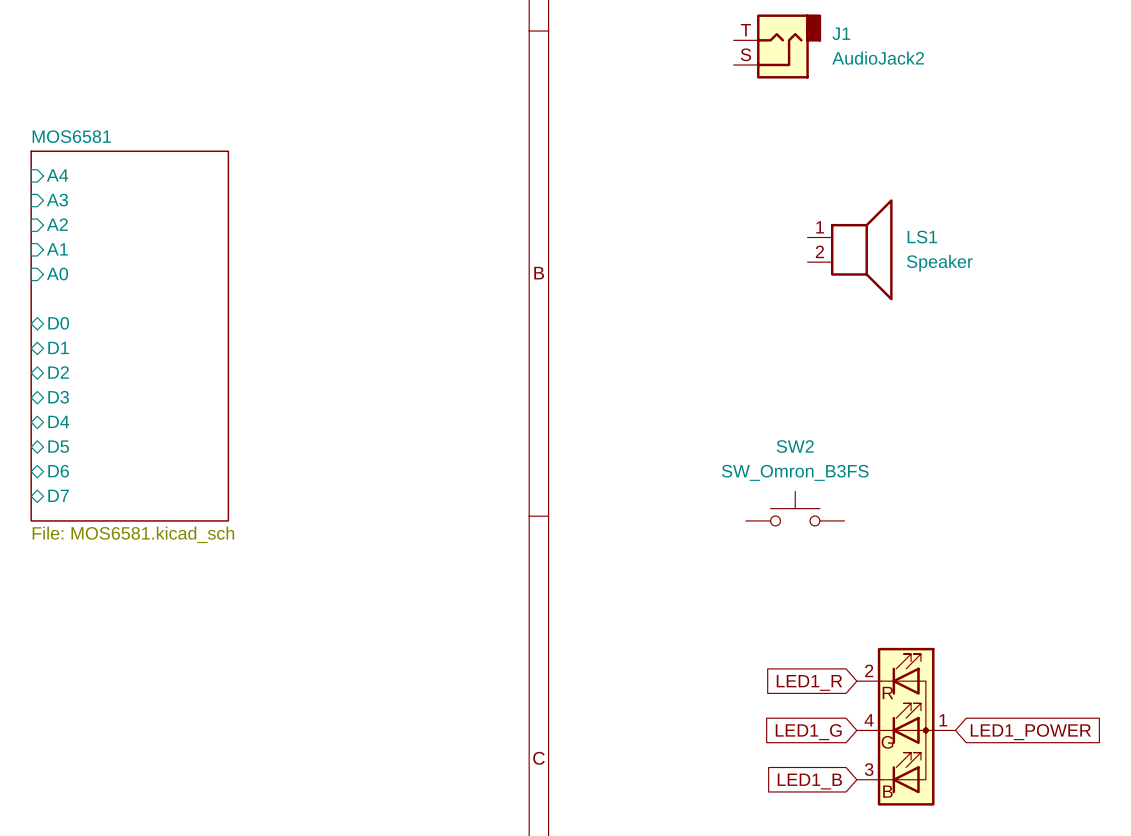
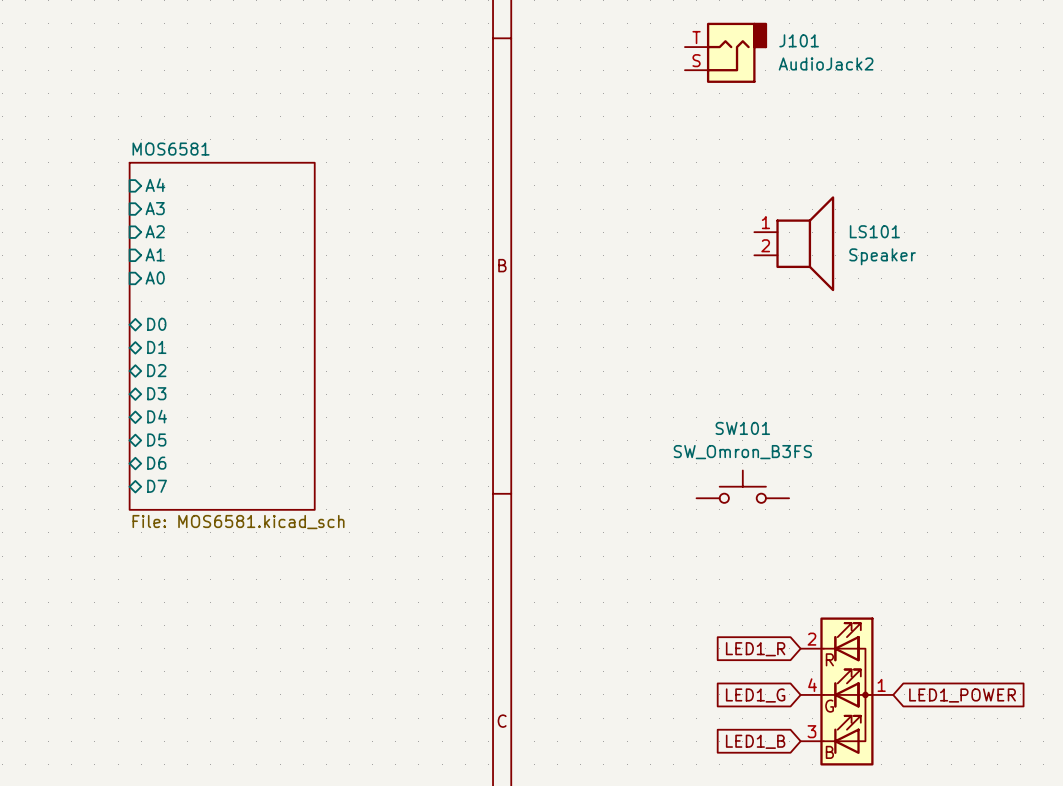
J1 name: J1 (841, 33) -> J101 (799, 40)
sheet pin position: A4 (57, 175) -> A4 (155, 185)
sheet pin position: A3 (57, 200) -> A3 (155, 208)
sheet pin position: A2 (57, 224) -> A2 (155, 231)
LS1 name: LS1 (922, 237) -> LS101 (874, 231)
sheet pin position: A1 (57, 249) -> A1 (155, 254)
sheet pin position: A0 (57, 274) -> A0 (155, 278)
sheet pin position: D0 (58, 323) -> D0 (156, 324)
sheet MOS6581 position: (129, 336) -> (222, 336)
sheet pin position: D1 (58, 347) -> D1 (156, 347)
sheet pin position: D2 (58, 372) -> D2 (156, 370)
sheet pin position: D3 (58, 397) -> D3 (156, 393)
sheet pin position: D4 (58, 421) -> D4 (157, 416)
sheet pin position: D5 (58, 446) -> D5 (156, 439)
SW2 name: SW2 (795, 446) -> SW101 (742, 428)
sheet pin position: D6 (58, 471) -> D6 (156, 463)
sheet pin position: D7 (58, 495) -> D7 (157, 486)

